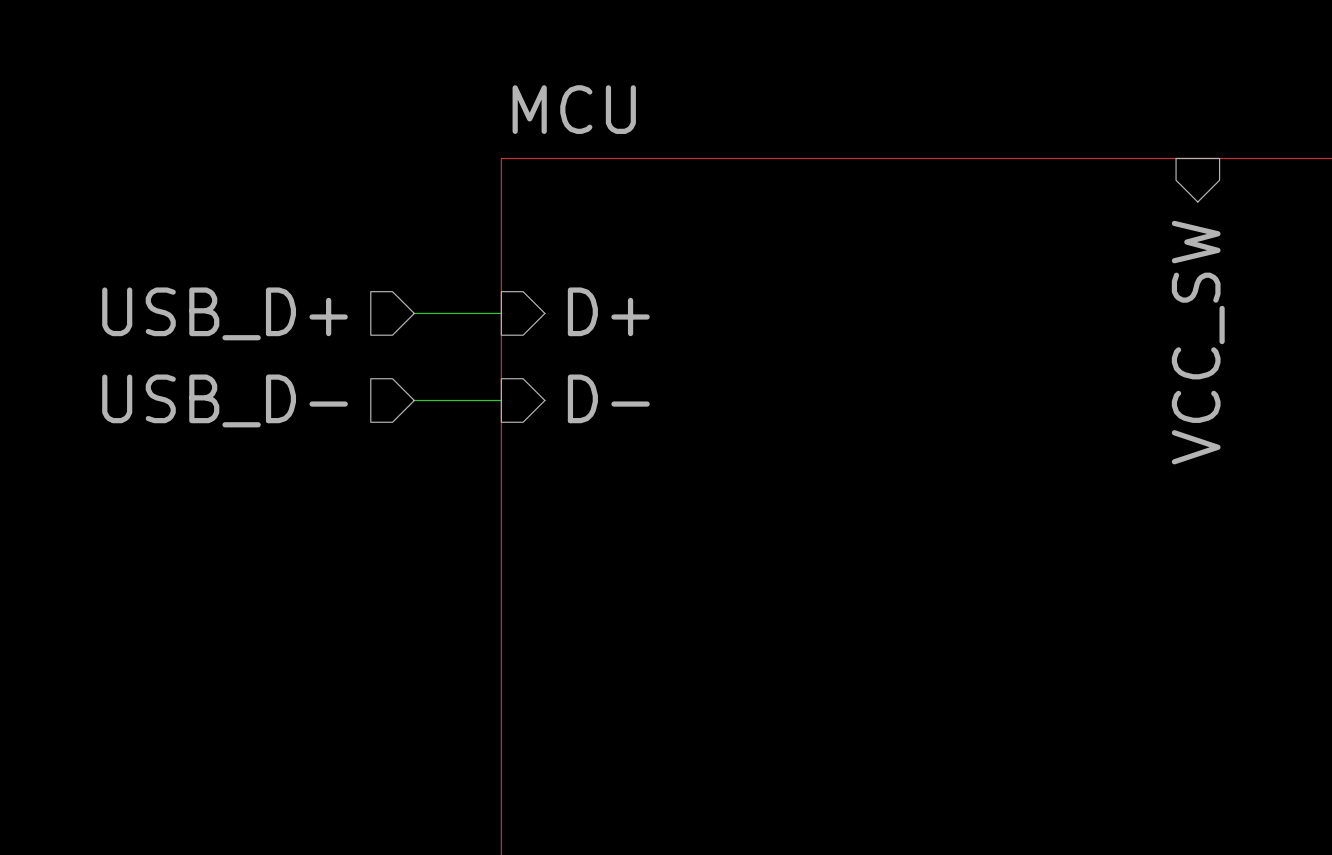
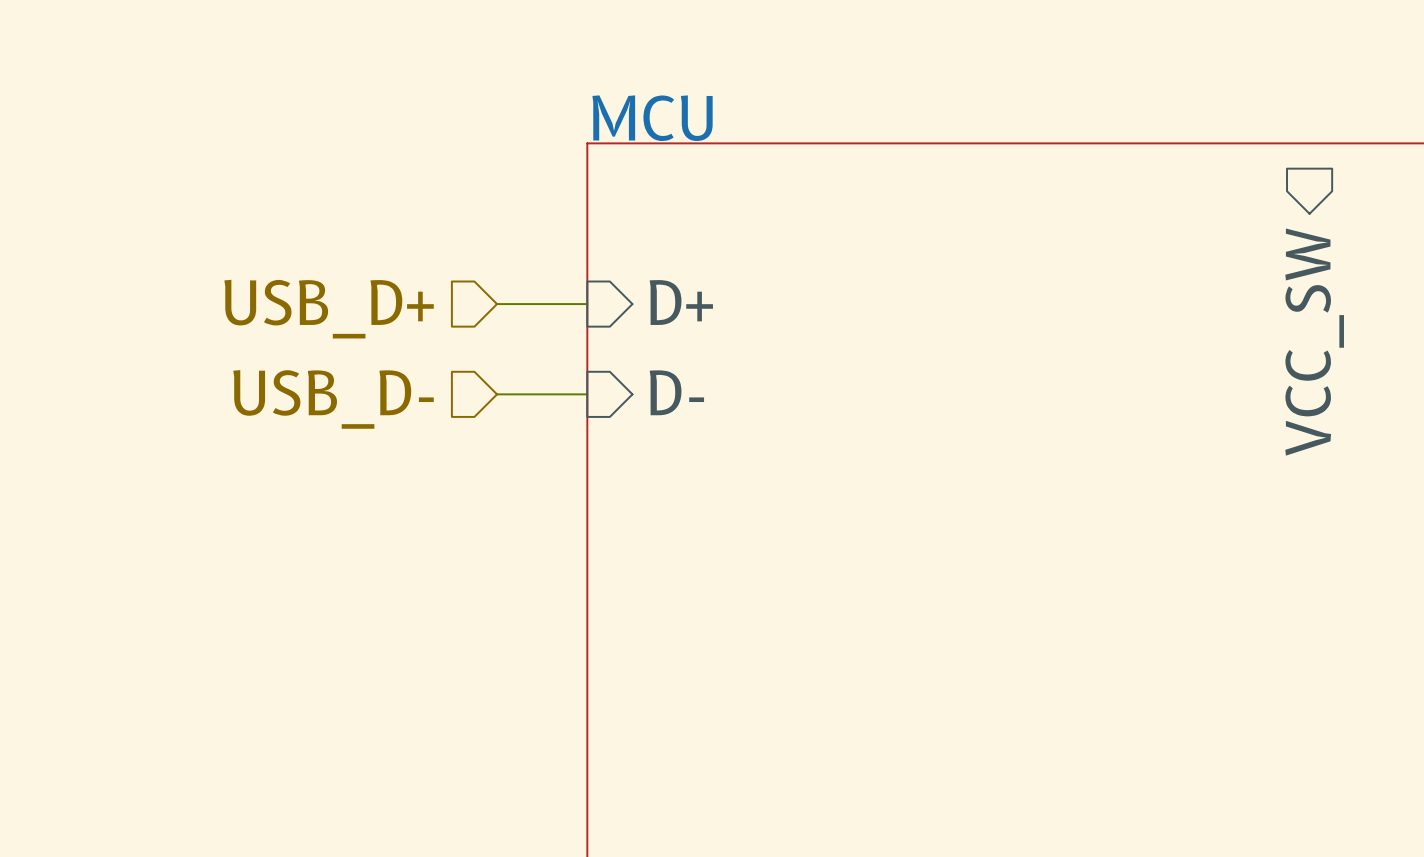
sheet MCU name position: MCU (574, 109) -> MCU (652, 118)
sheet pin position: VCC_SW (1198, 342) -> VCC_SW (1314, 342)

